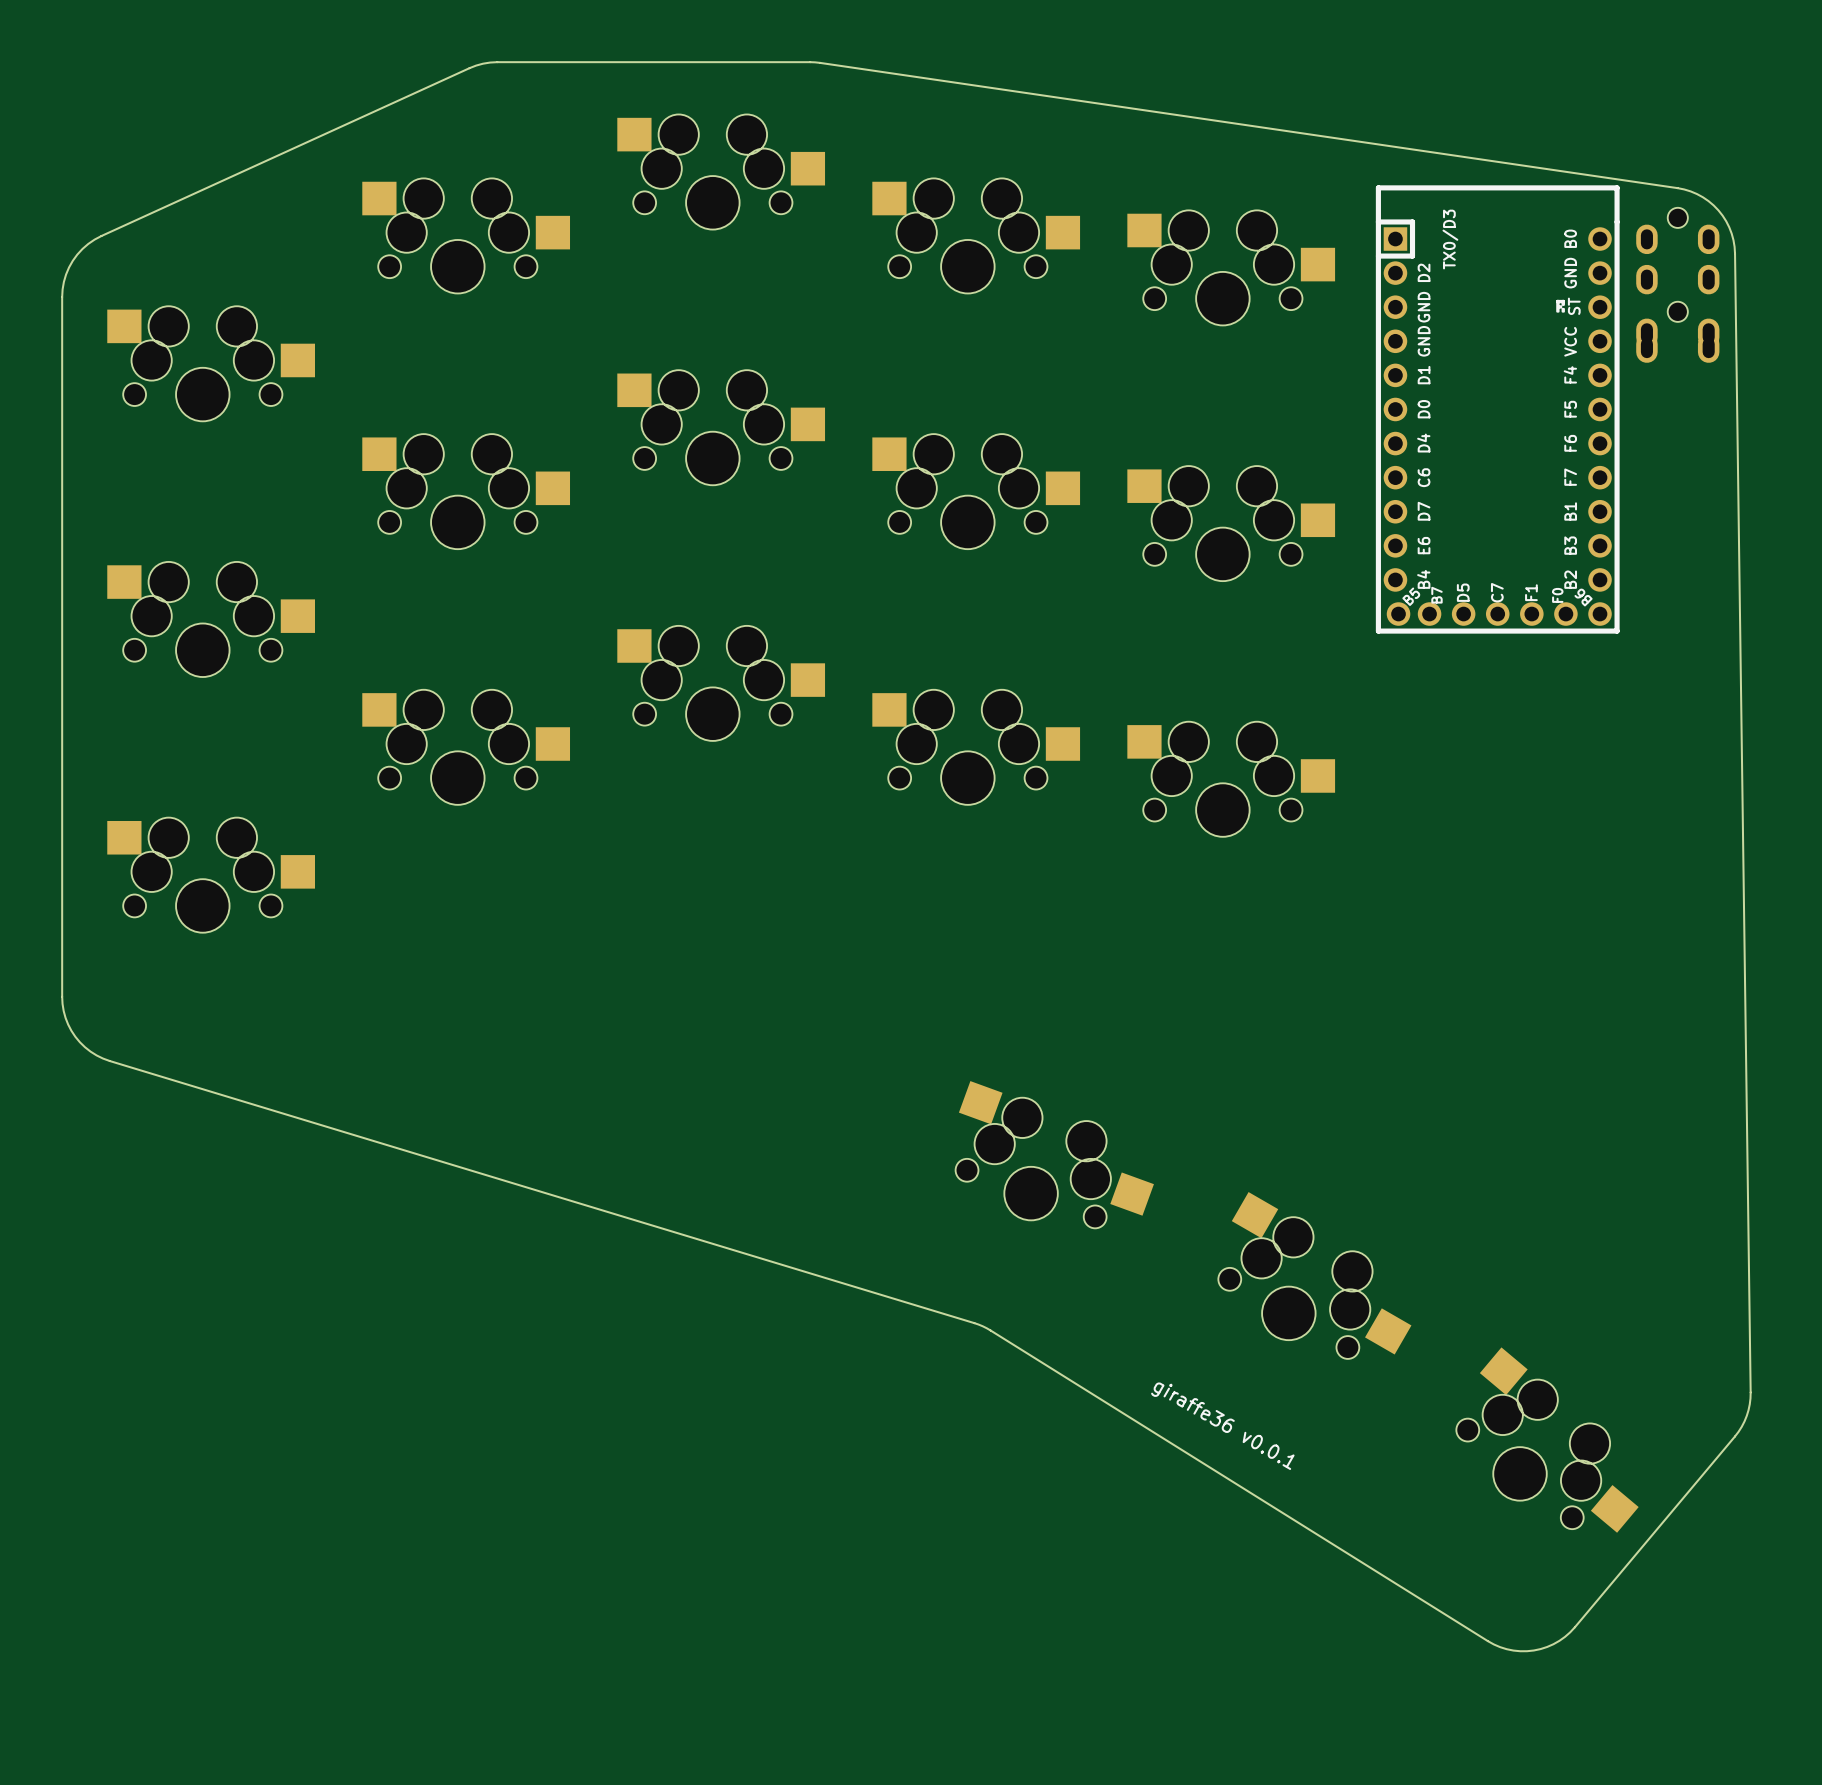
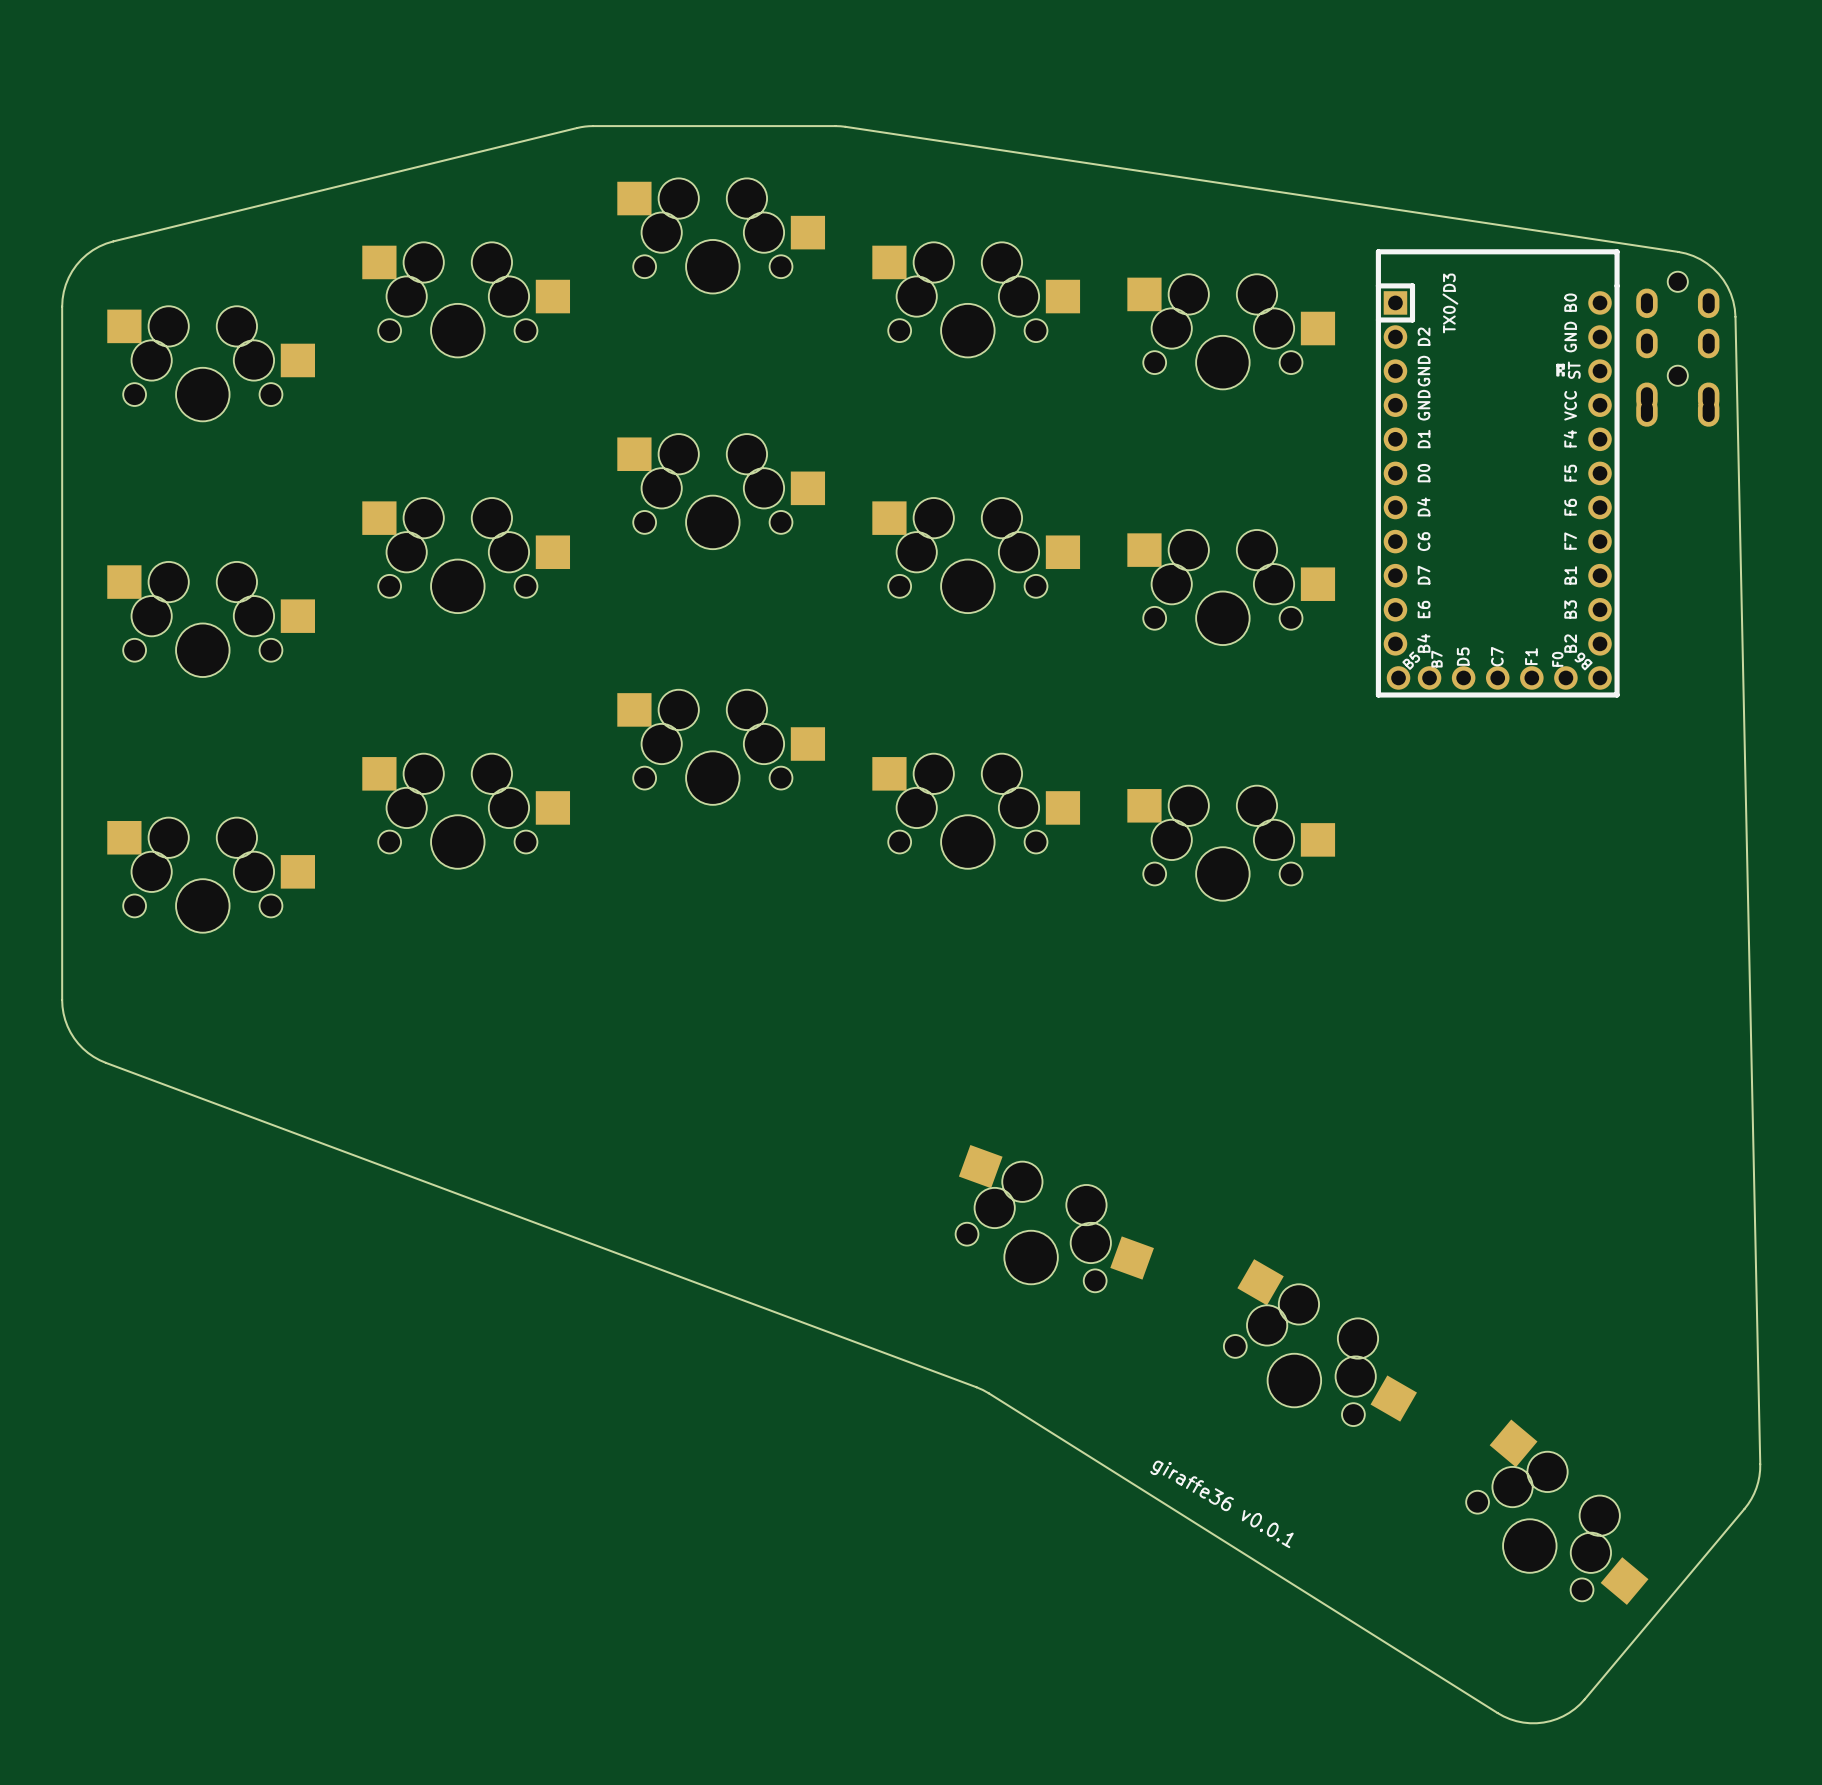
board edge: (810, 62) (1677, 188) (1702, 197) (1722, 215) (1731, 233) (1735, 253) (1750, 1392) (1746, 1415) (1734, 1436) (1570, 1632) (1553, 1644) (1540, 1649) (1527, 1651) (1506, 1649) (1487, 1641) (982, 1326) (109, 1061) (90, 1051) (75, 1036) (65, 1017) (62, 996) -> (62, 306) (65, 284) (76, 265) (92, 250) (106, 243) (577, 128) (593, 126) (845, 126) (1678, 251) (1693, 256) (1707, 263) (1718, 273) (1727, 286) (1733, 301) (1735, 316) (1760, 1464) (1758, 1482) (1754, 1493) (1744, 1508) (1580, 1704) (1569, 1712) (1550, 1721) (1536, 1723) (1516, 1721) (1497, 1713) (982, 1389) (105, 1062) (88, 1052) (74, 1038) (65, 1020) (62, 996)
board edge: (810, 62) (497, 62) (476, 65) (94, 239) (82, 248) (69, 267) (63, 281) (62, 306) -> none
part position: (721, 172) -> (721, 235)
part position: (466, 235) -> (466, 299)
part position: (976, 235) -> (976, 299)
part position: (1231, 267) -> (1231, 331)
part position: (1677, 285) -> (1677, 349)
part position: (1497, 409) -> (1497, 473)
part position: (721, 427) -> (721, 491)
part position: (466, 491) -> (466, 555)
part position: (976, 491) -> (976, 555)
part position: (1231, 523) -> (1231, 587)
part position: (721, 683) -> (721, 747)
part position: (466, 747) -> (466, 811)
part position: (976, 747) -> (976, 811)
part position: (1231, 779) -> (1231, 843)
part position: (1054, 1154) -> (1054, 1218)
part position: (1314, 1275) -> (1320, 1342)
text position: giraffe36 v0.0.1 (1222, 1426) -> giraffe36 v0.0.1 (1221, 1504)
part position: (1547, 1440) -> (1557, 1512)

